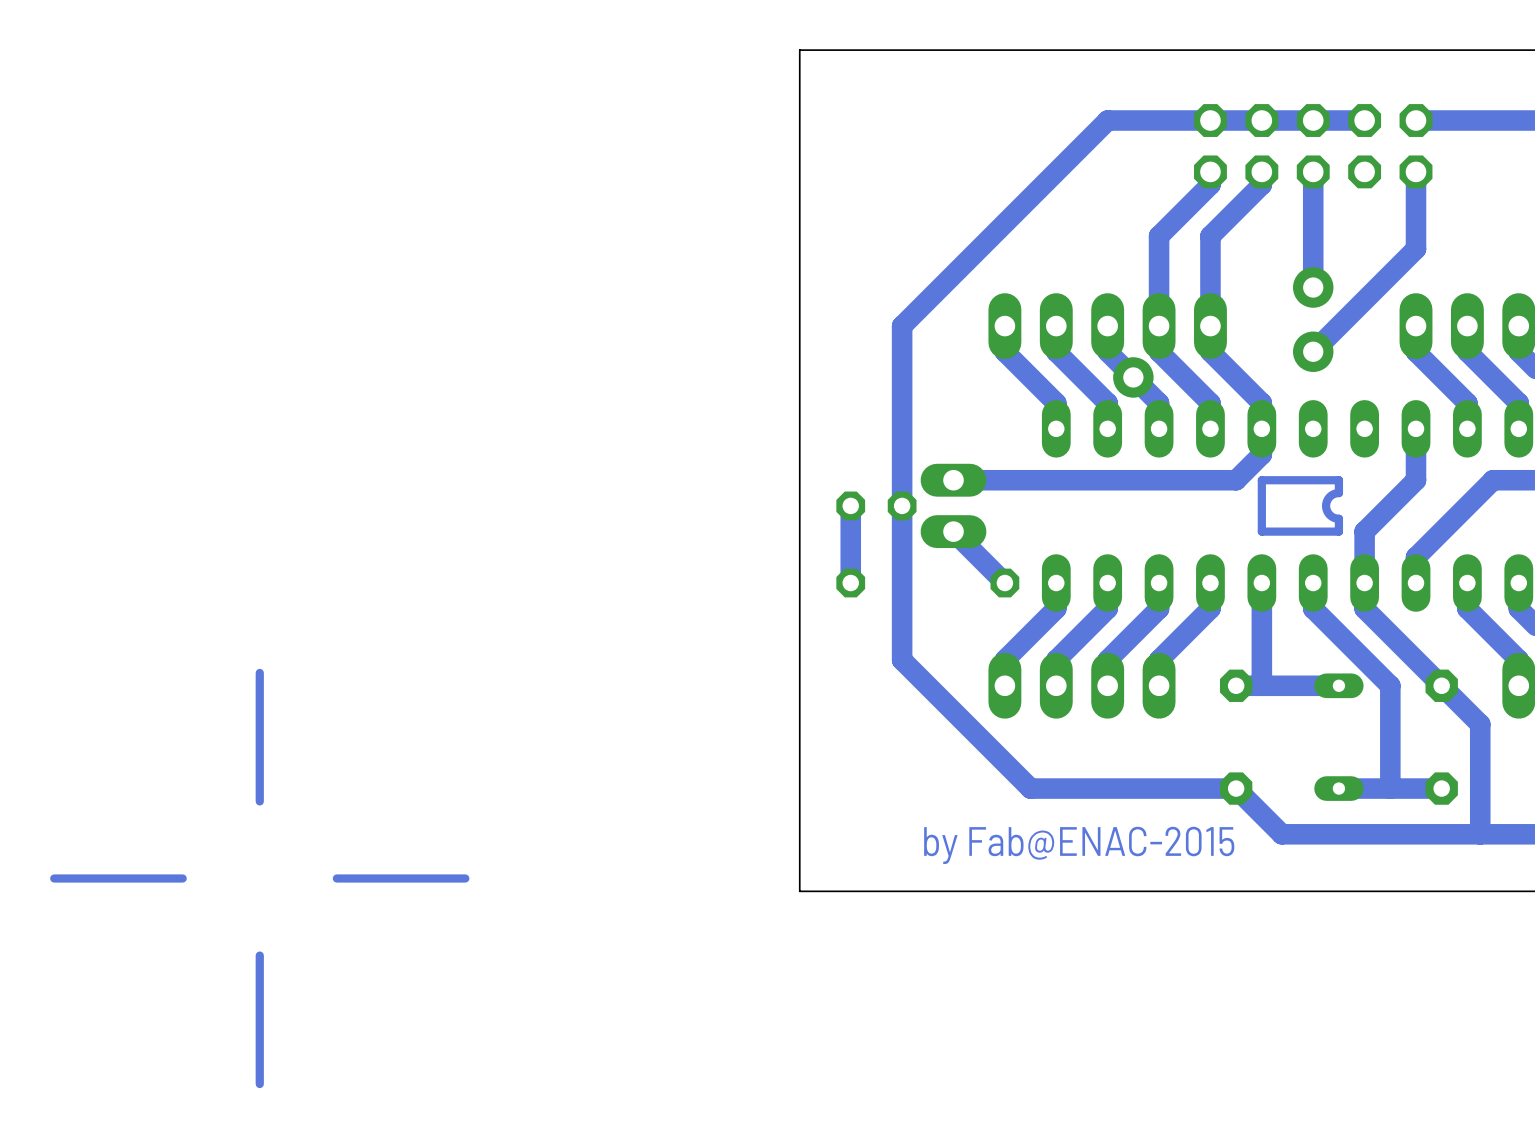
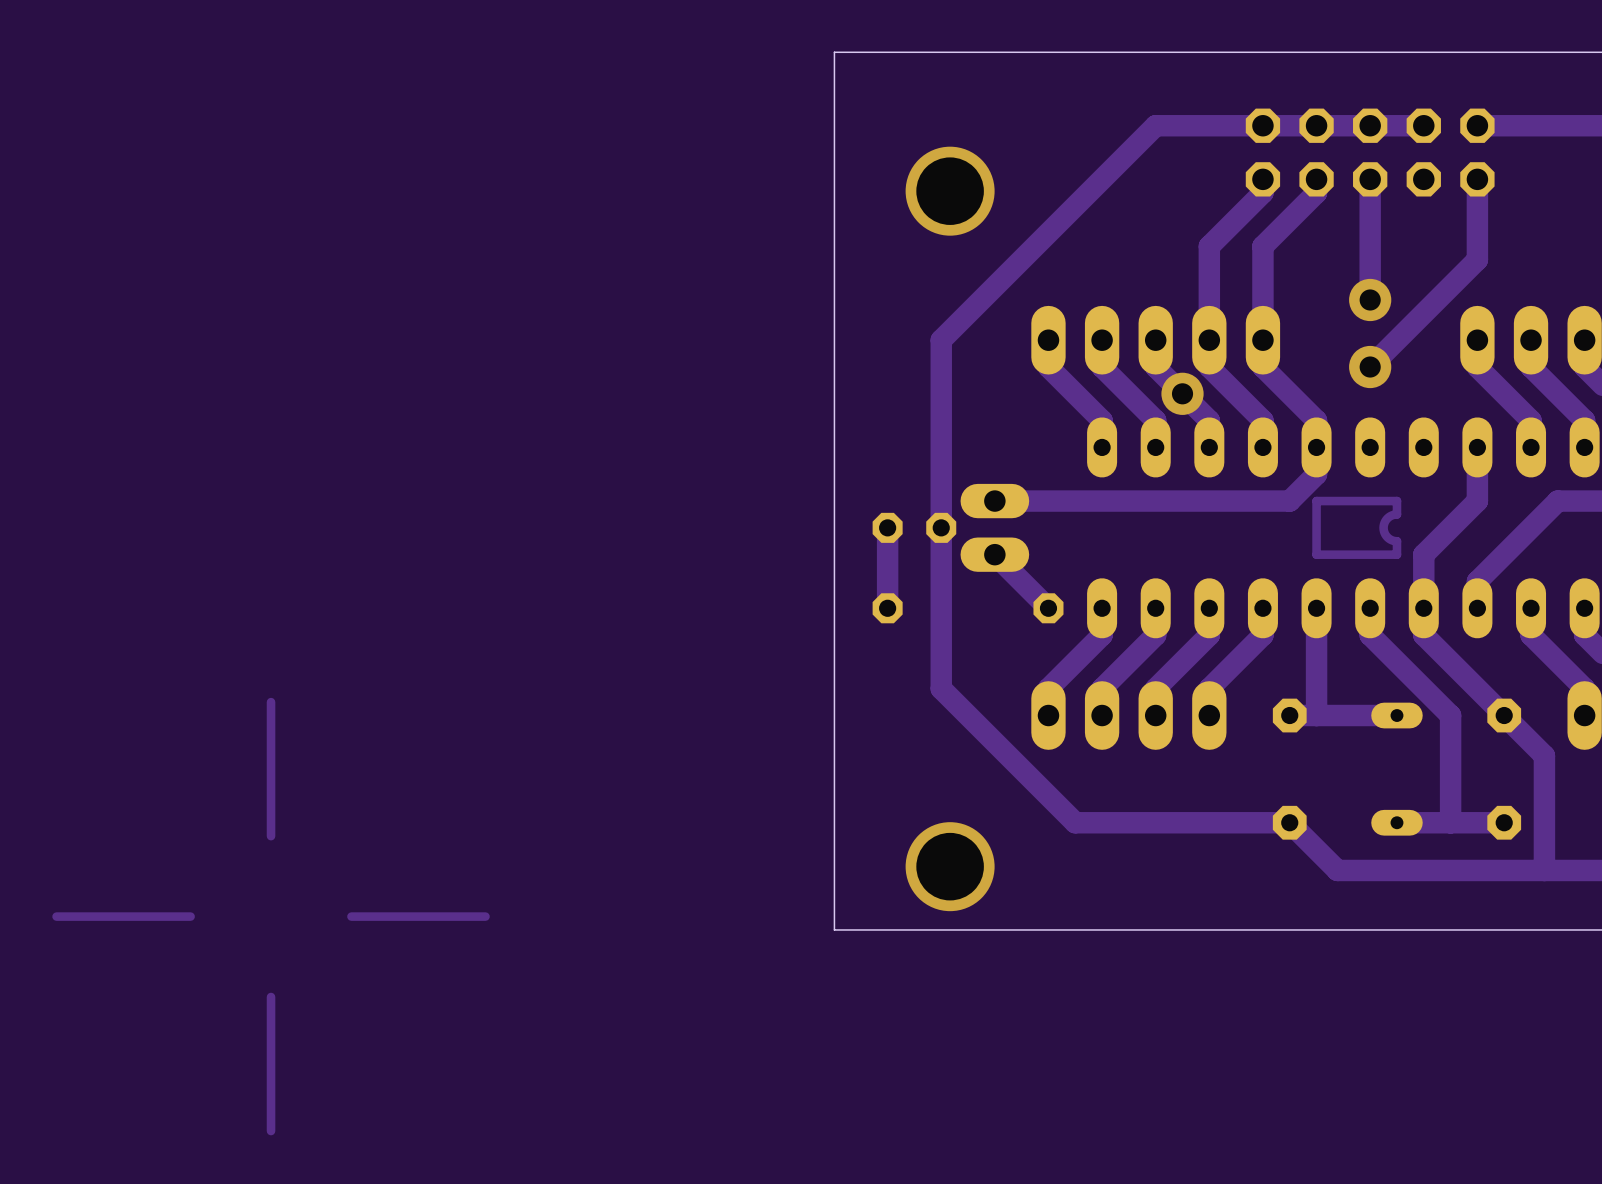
via: none -> (950, 191)
via: none -> (950, 866)
text: by Fab@ENAC-2015 (1079, 845) -> none

